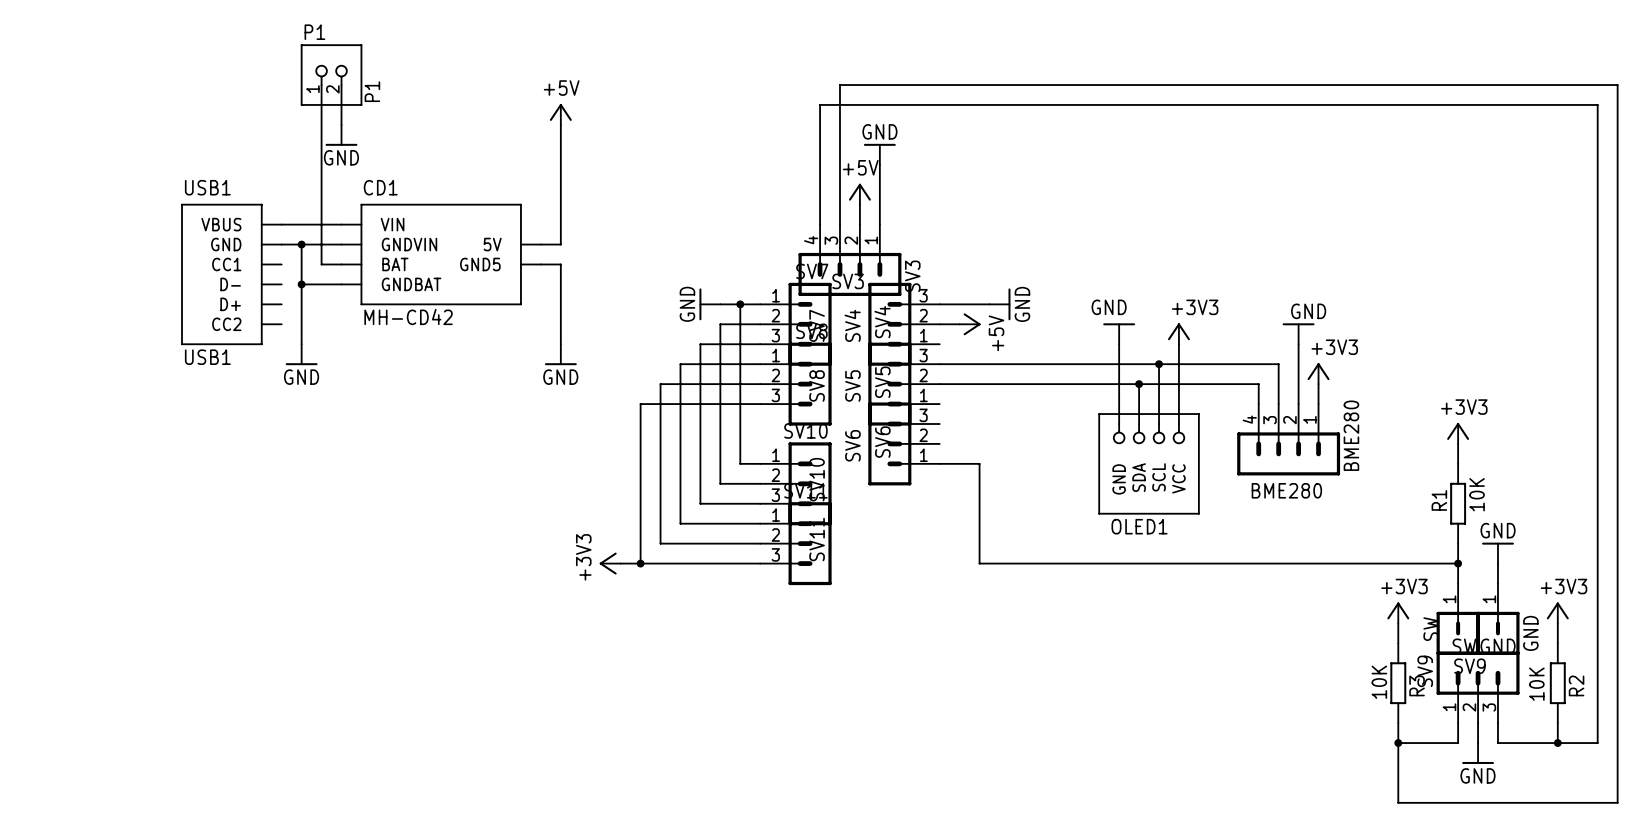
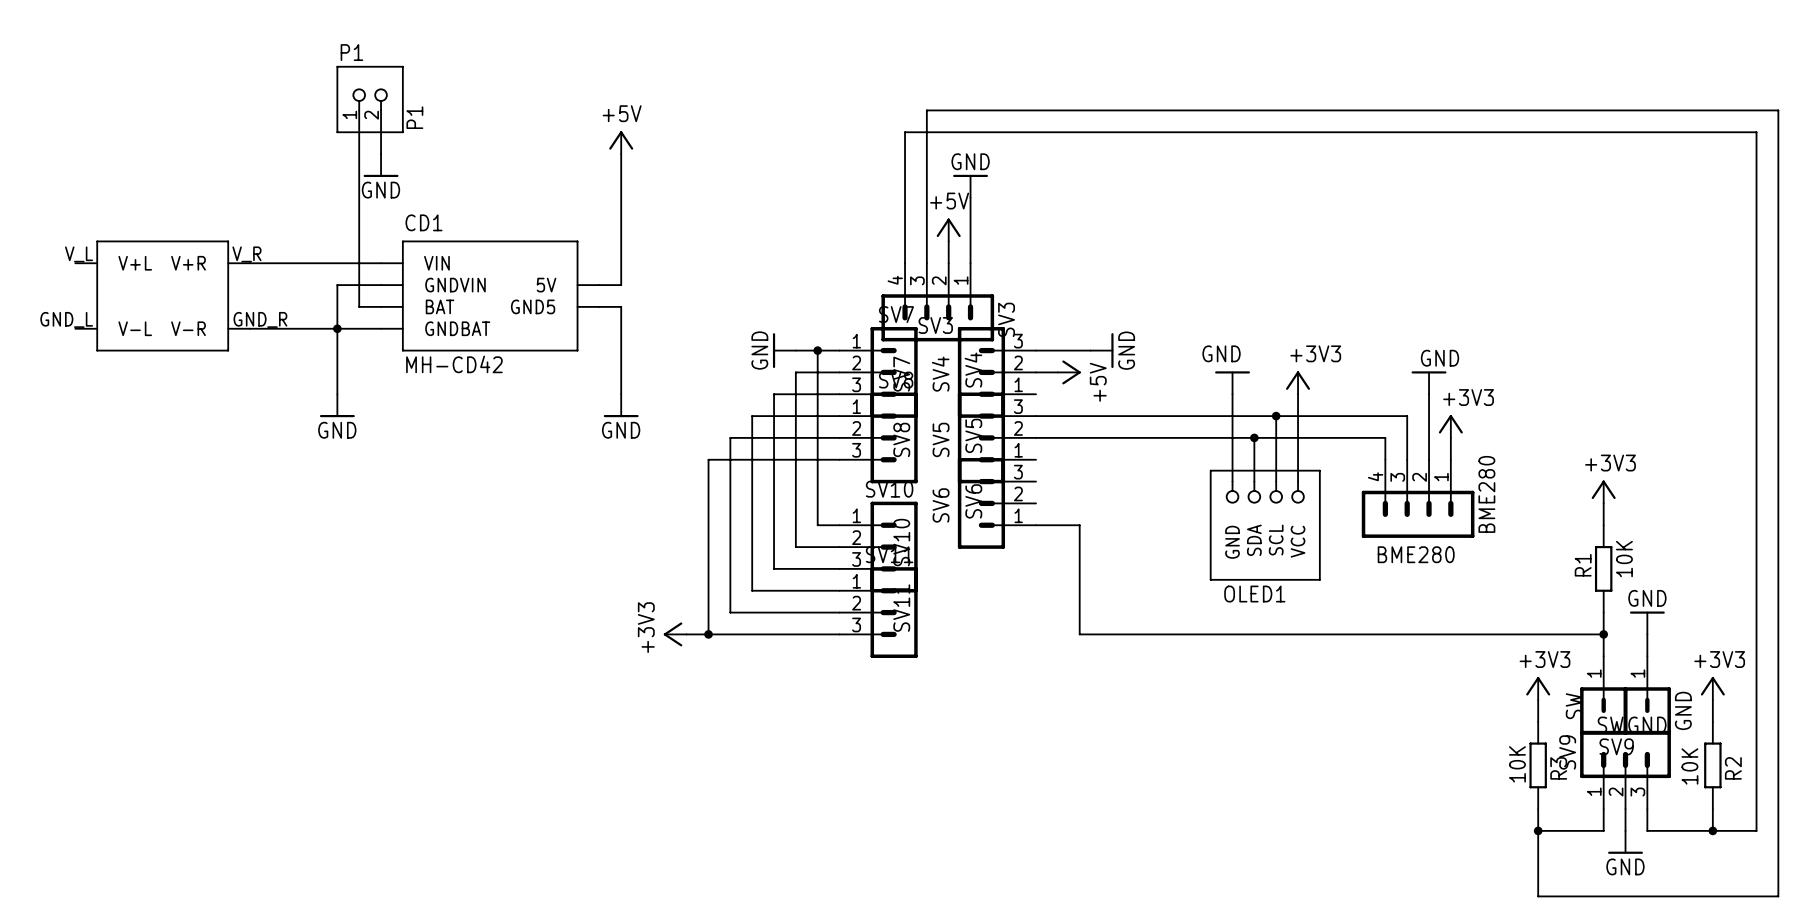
wire: none -> (250, 263) (315, 263)
wire: (281, 244) (301, 244) -> none
junction: (301, 244) -> none
part: none -> (162, 296)
USB1: USB1 (231, 274) -> none
wire: none -> (250, 328) (337, 328)

